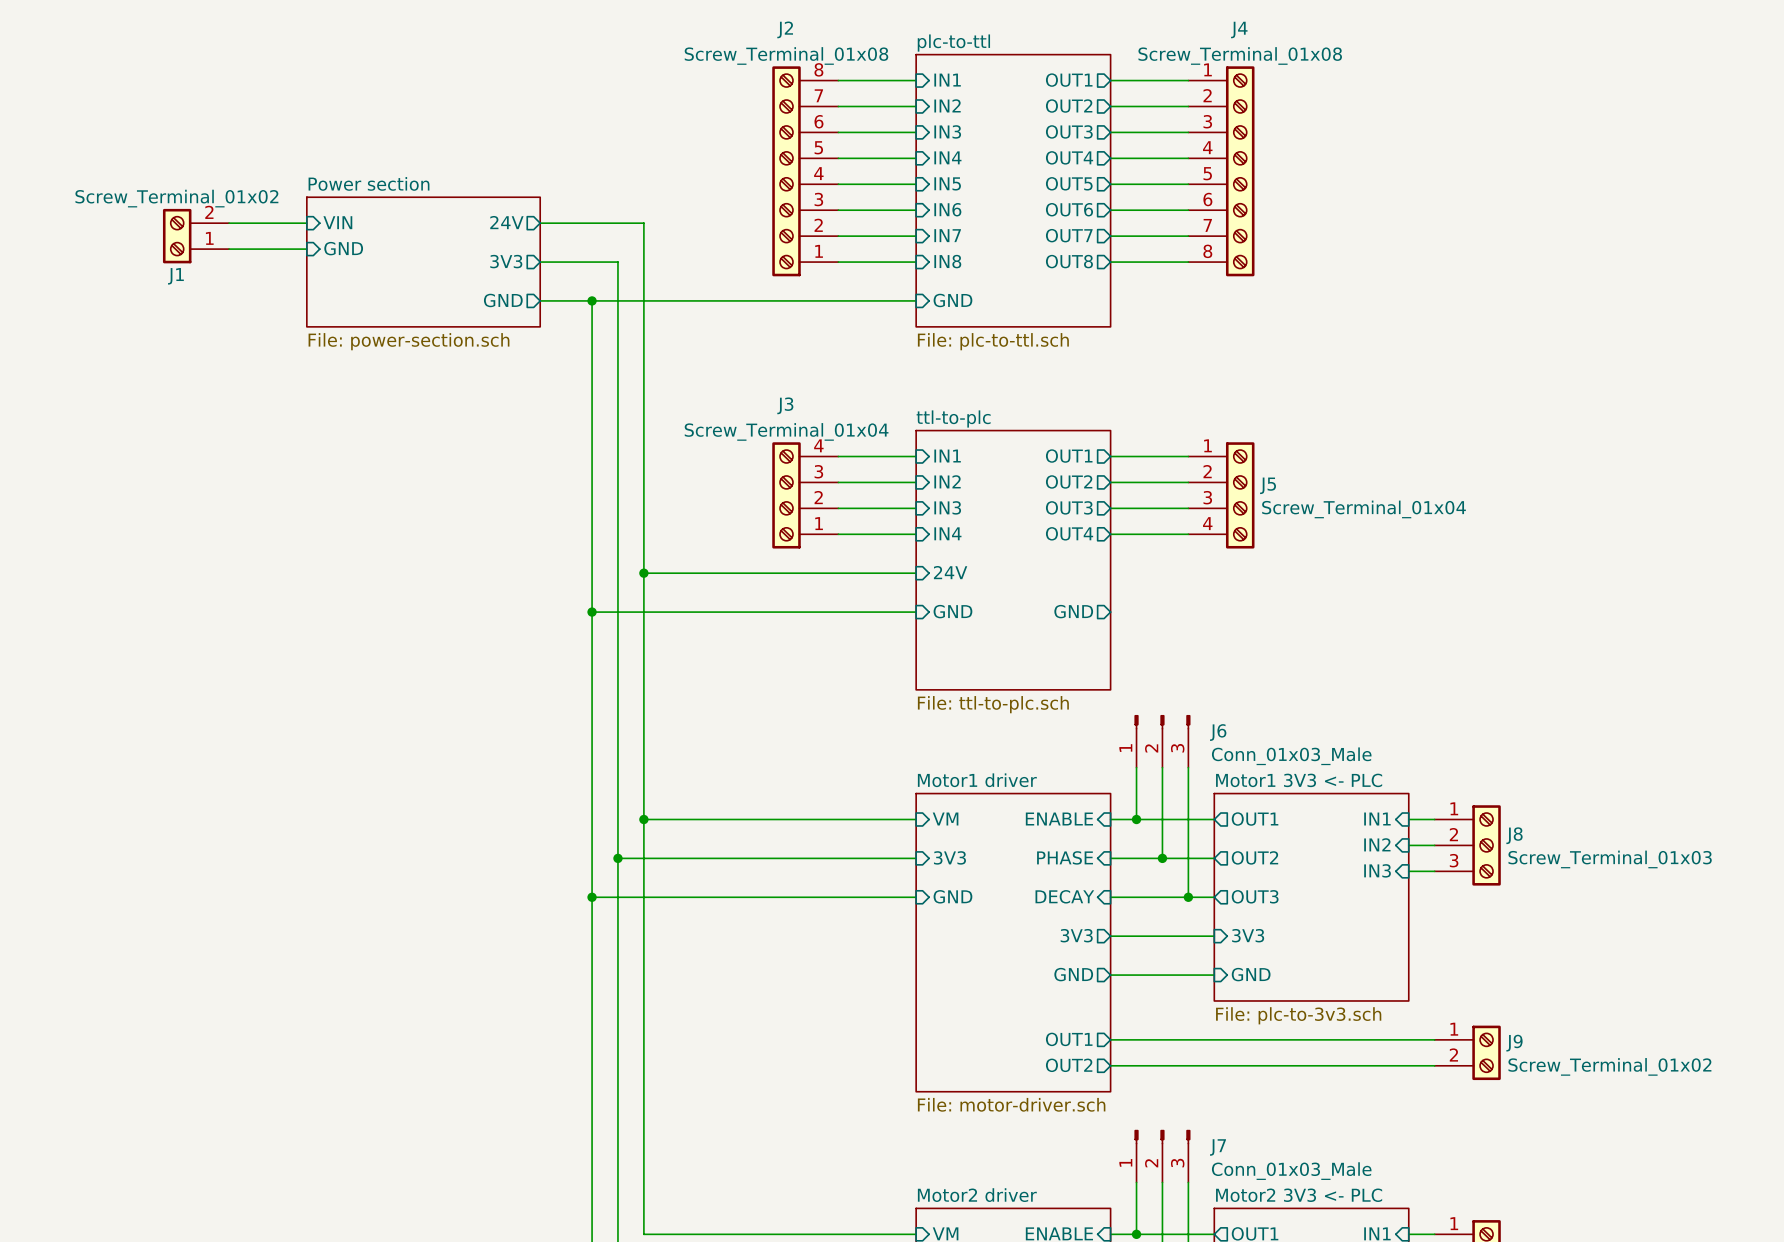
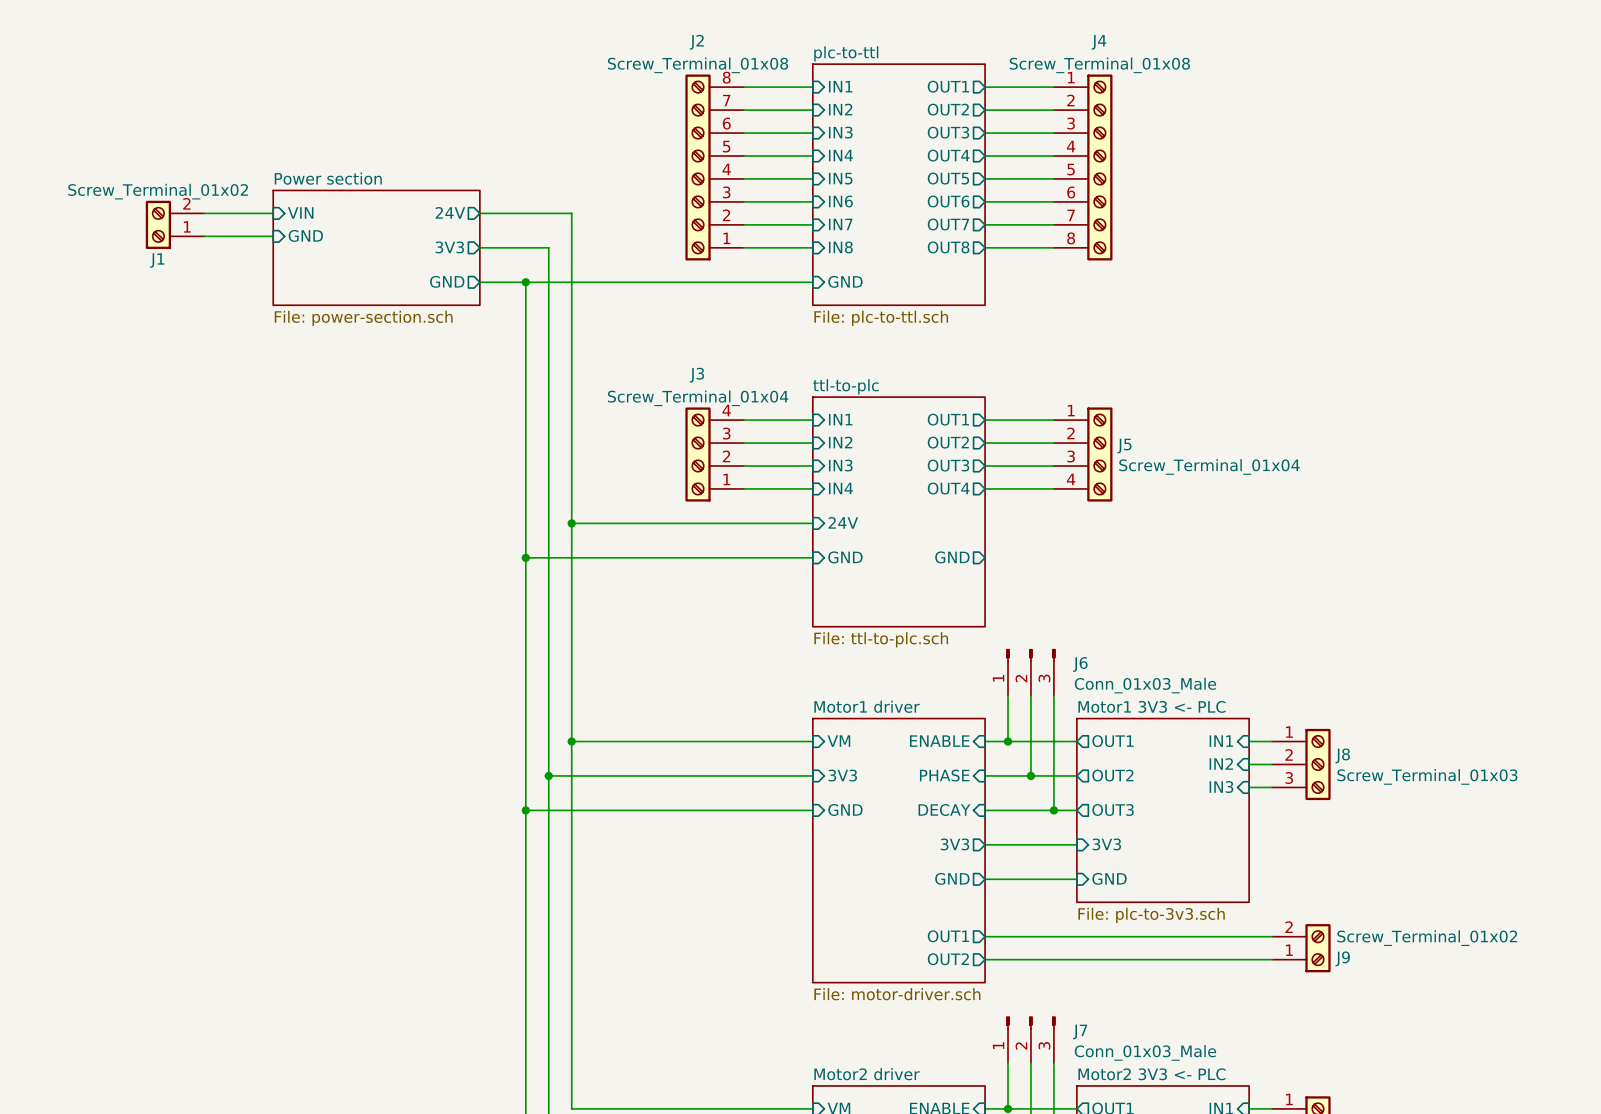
J9 flip: as is (1486, 1052) -> up-down (1317, 948)

